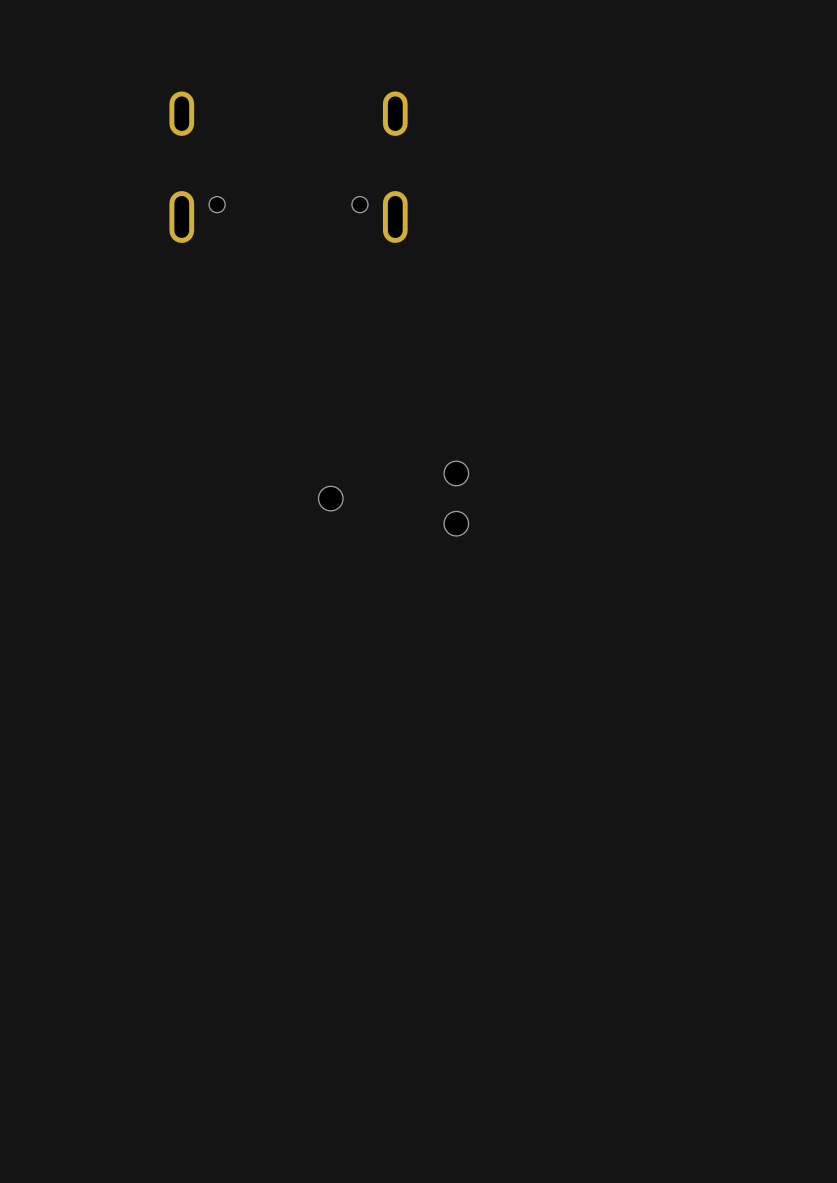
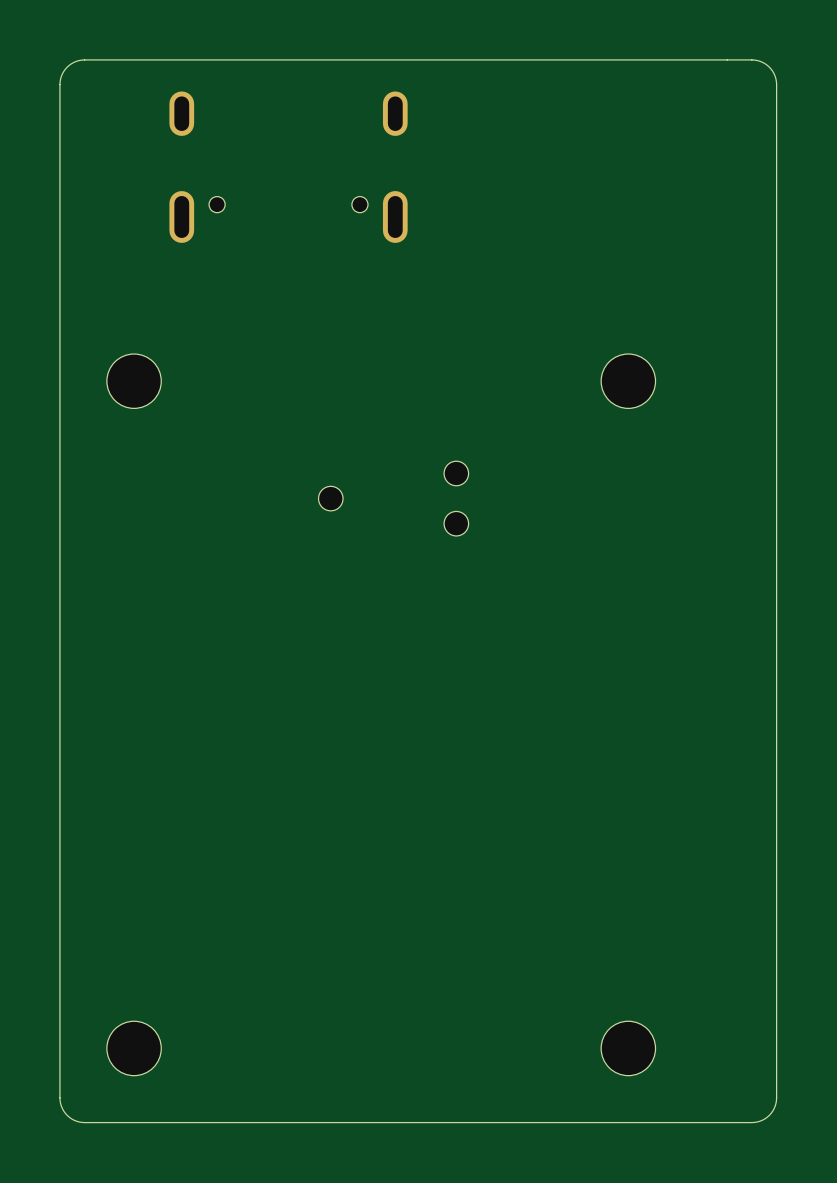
board edge: none -> (751, 59) (84, 59) (73, 62) (63, 71) (59, 84) (59, 1097) (62, 1108) (71, 1118) (84, 1122) (751, 1122) (765, 1118) (772, 1111) (776, 1097) (776, 84) (774, 73) (769, 67) (762, 62) (751, 59)
part: none -> (134, 381)
part: none -> (628, 381)
part: none -> (134, 1048)
part: none -> (628, 1048)

